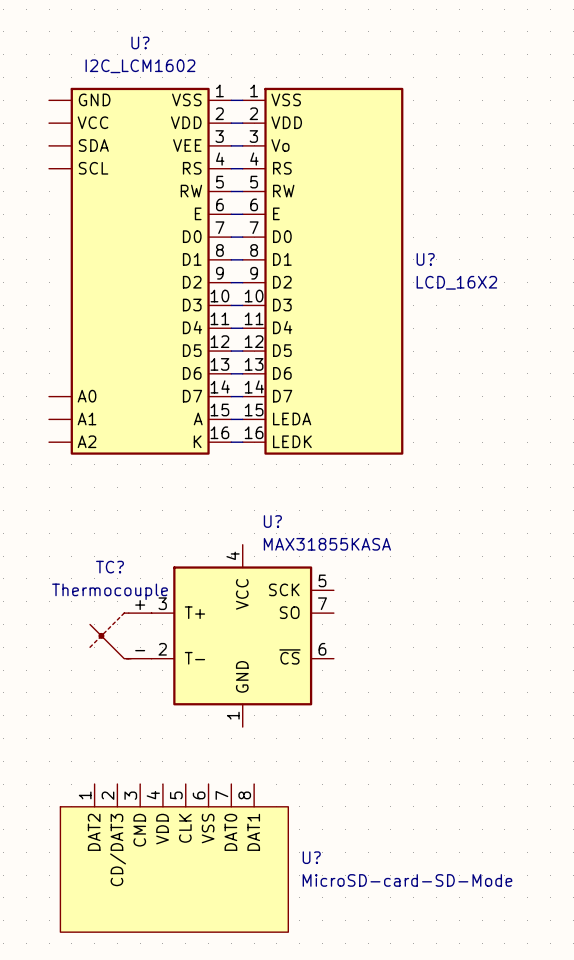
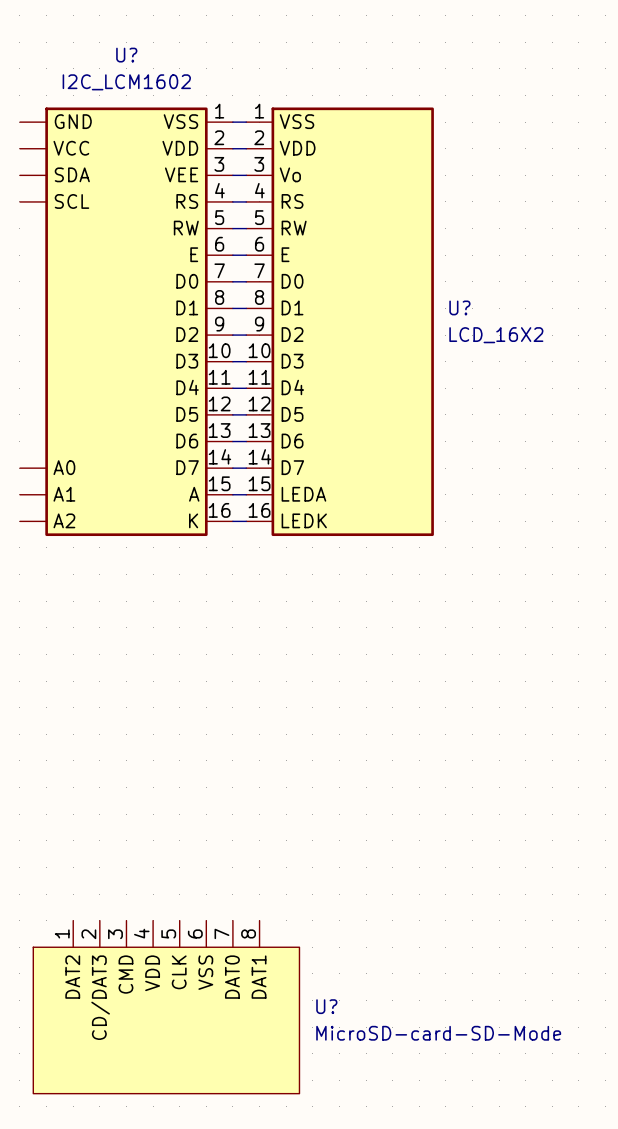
TC?: Thermocouple (120, 635) -> none
U?: MAX31855KASA (242, 635) -> none

